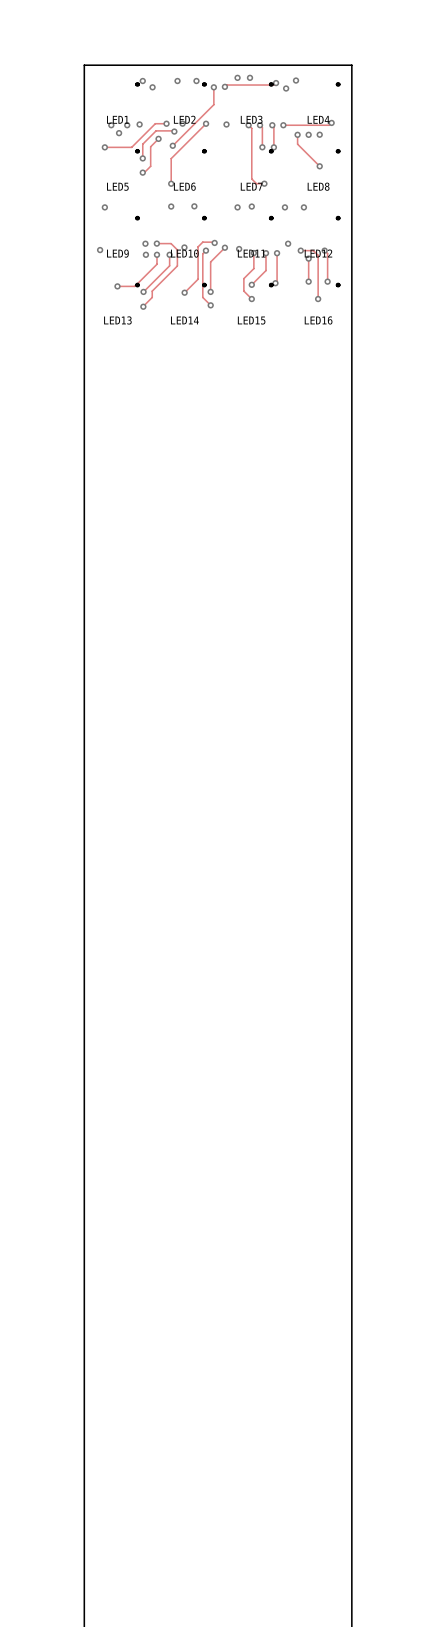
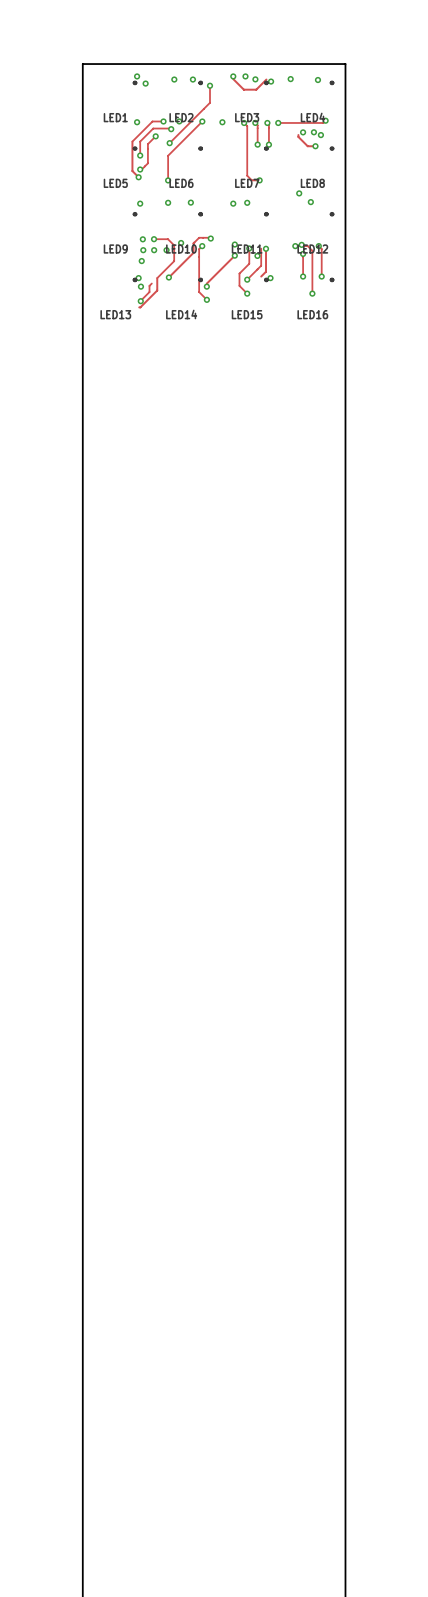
via: none -> (137, 76)
track: none -> (233, 79) (243, 89) (256, 89) (266, 79)
via: none -> (255, 79)
via: (142, 81) -> none
via: none -> (317, 80)
track: (276, 83) (274, 85) (226, 85) (224, 86) -> none
via: none -> (145, 83)
via: (224, 86) -> none
via: (152, 87) -> none
via: (286, 88) -> none
via: (111, 125) -> none
via: (127, 125) -> none
via: (119, 133) -> none
track: (297, 134) (297, 144) (319, 166) -> none
via: (297, 134) -> none
track: none -> (298, 135) (307, 146) (315, 146)
via: none -> (320, 135)
track: (134, 144) (131, 147) (104, 147) -> (132, 141) (132, 171) (138, 177)
via: (104, 147) -> none
via: none -> (315, 146)
via: (319, 166) -> none
via: none -> (138, 177)
via: none -> (299, 193)
via: none -> (310, 202)
via: (104, 207) -> none
via: none -> (140, 203)
via: (284, 207) -> none
via: (303, 207) -> none
via: (288, 243) -> none
track: (198, 246) (198, 279) (184, 292) -> (194, 242) (193, 252) (168, 277)
track: (224, 247) (210, 262) (210, 288) -> (234, 255) (206, 283)
via: (224, 247) -> none
via: none -> (301, 244)
via: (100, 250) -> none
via: (266, 253) -> none
track: none -> (266, 248) (266, 271) (261, 276)
via: none -> (266, 248)
track: (277, 253) (275, 283) -> none
via: (277, 253) -> none
track: (156, 254) (156, 264) (134, 286) (117, 286) -> none
track: (169, 254) (169, 265) (143, 291) -> none
via: none -> (234, 255)
via: none -> (257, 255)
via: none -> (141, 261)
via: none -> (138, 278)
track: (160, 283) (154, 288) -> (157, 278) (157, 290) (139, 307)
via: (117, 286) -> none
via position: (184, 292) -> (168, 277)

